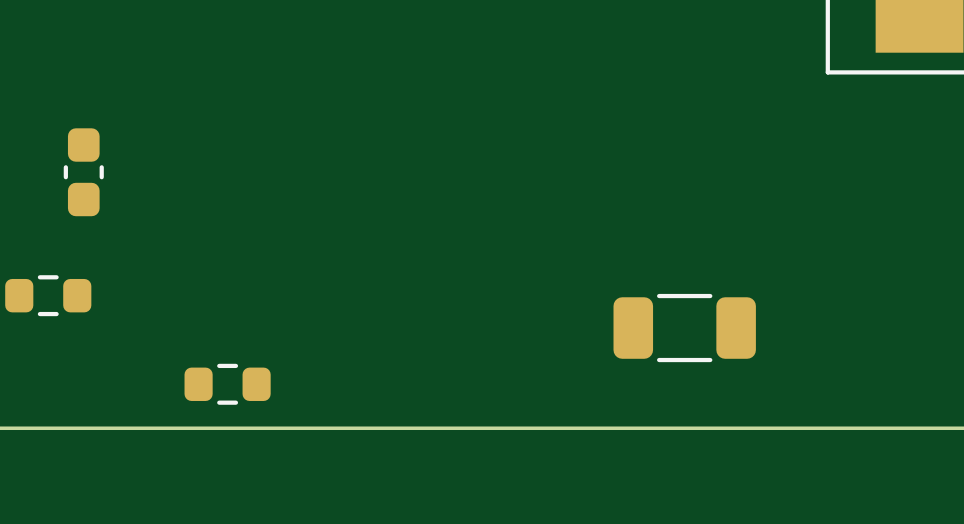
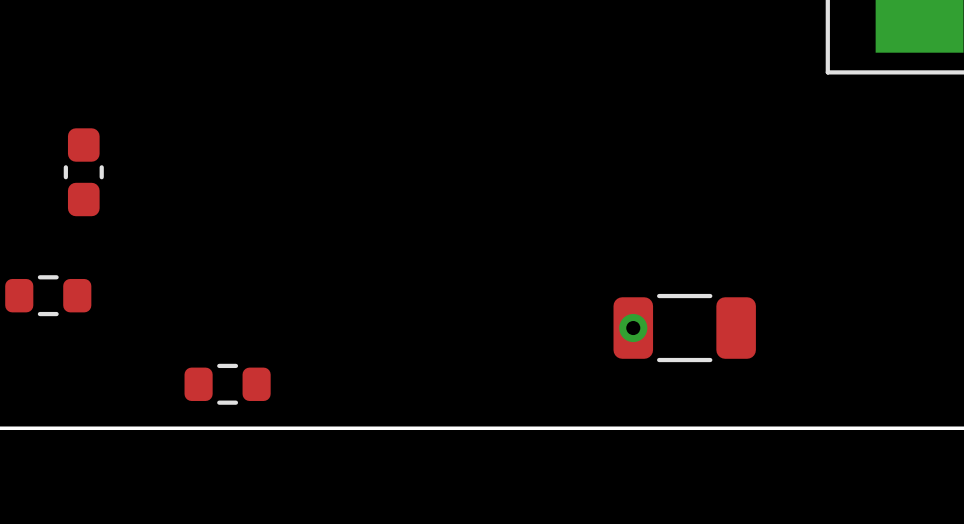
via: none -> (633, 328)

